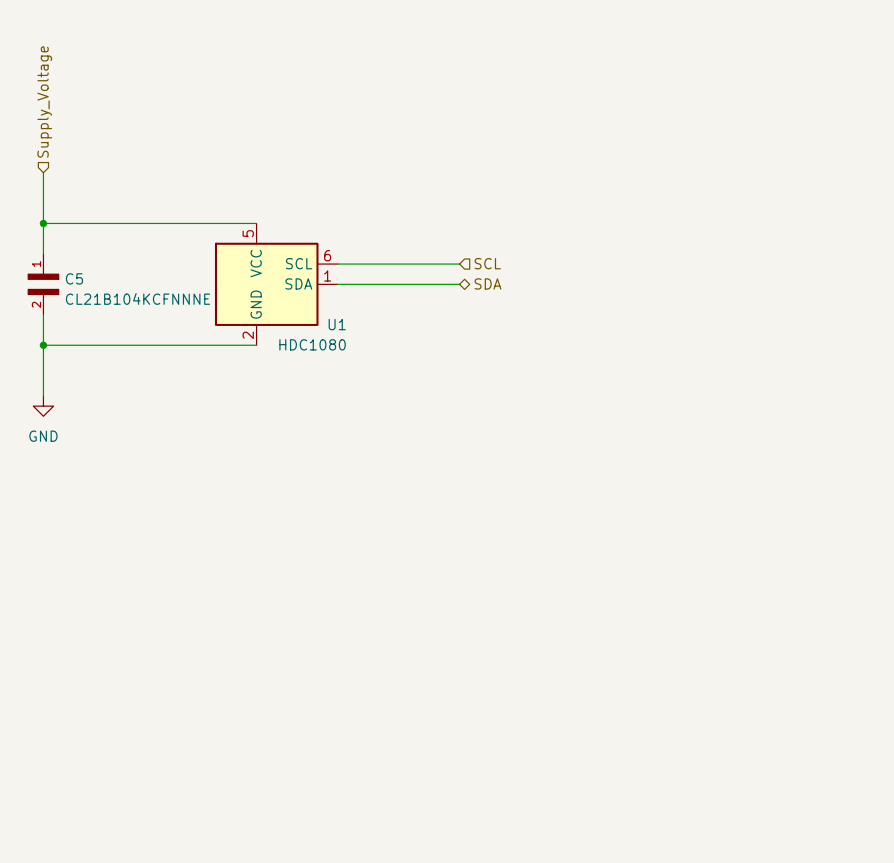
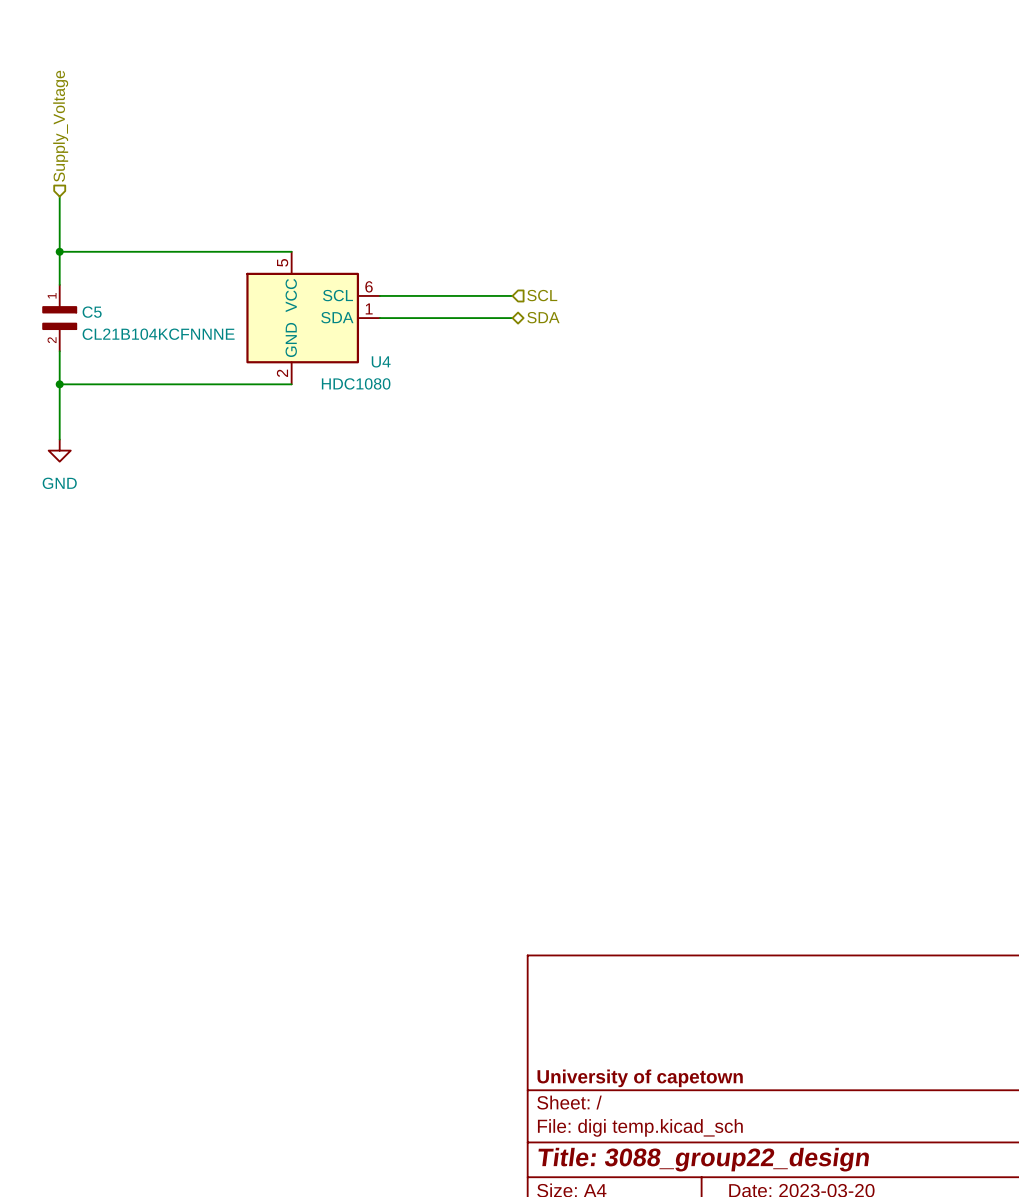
U1 name: U1 (337, 324) -> U4 (381, 361)

